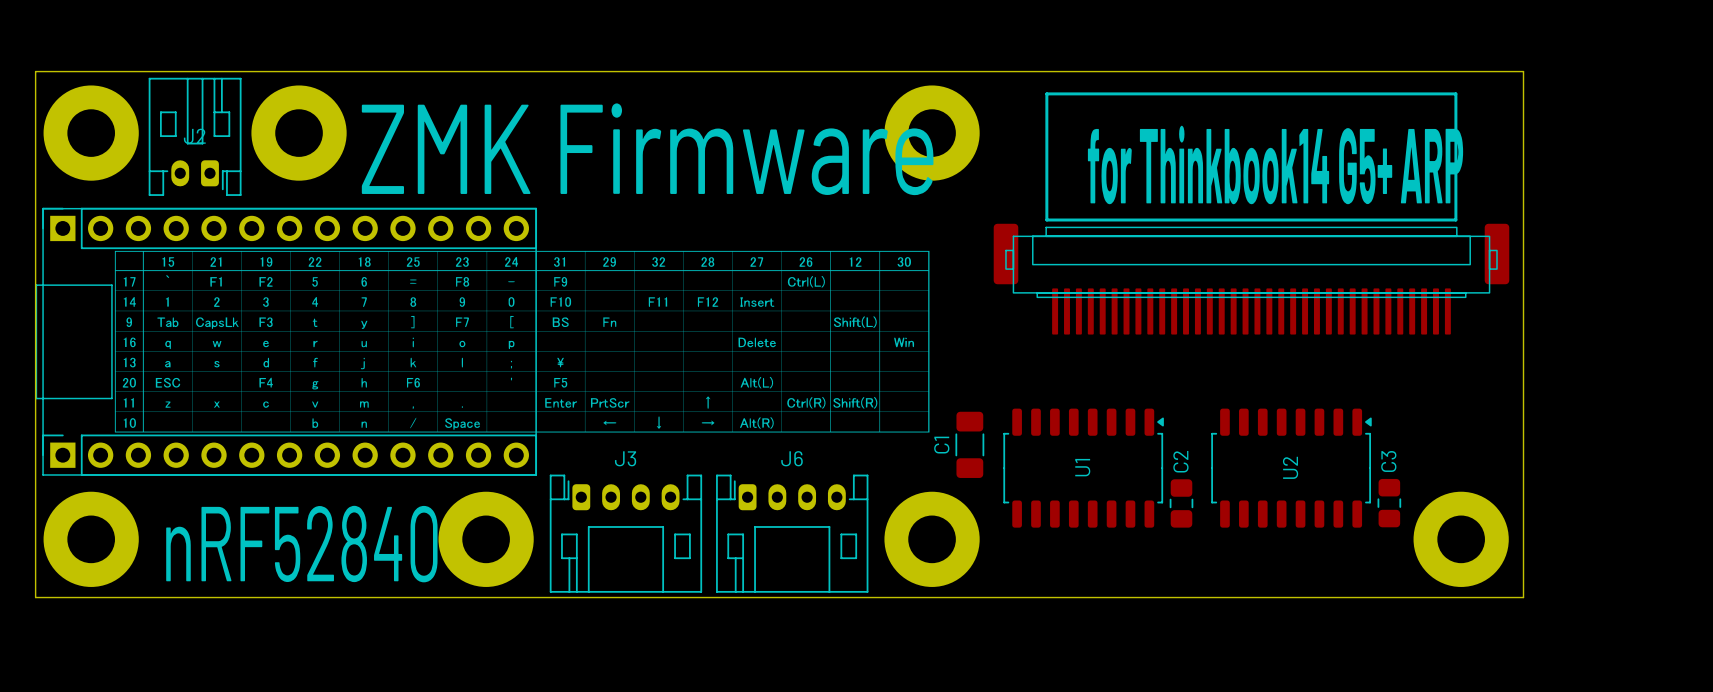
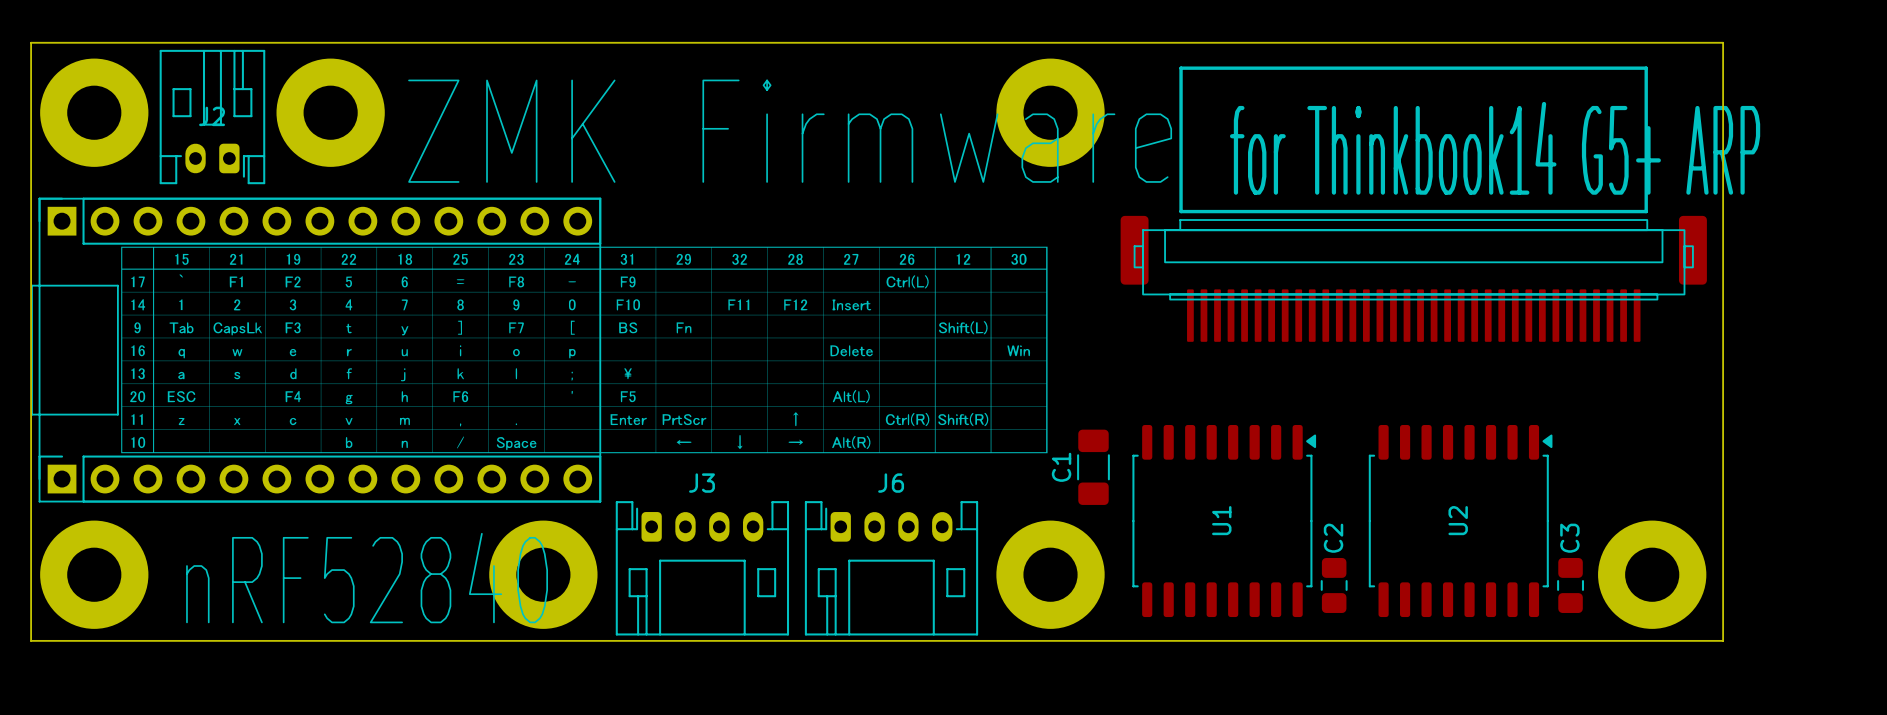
U1 footprint: [1003, 408, 1164, 528] -> [1132, 424, 1317, 618]
U2 footprint: [1211, 408, 1372, 528] -> [1368, 424, 1553, 618]
C2 position: (1181, 503) -> (1334, 585)
C3 position: (1389, 503) -> (1570, 585)

